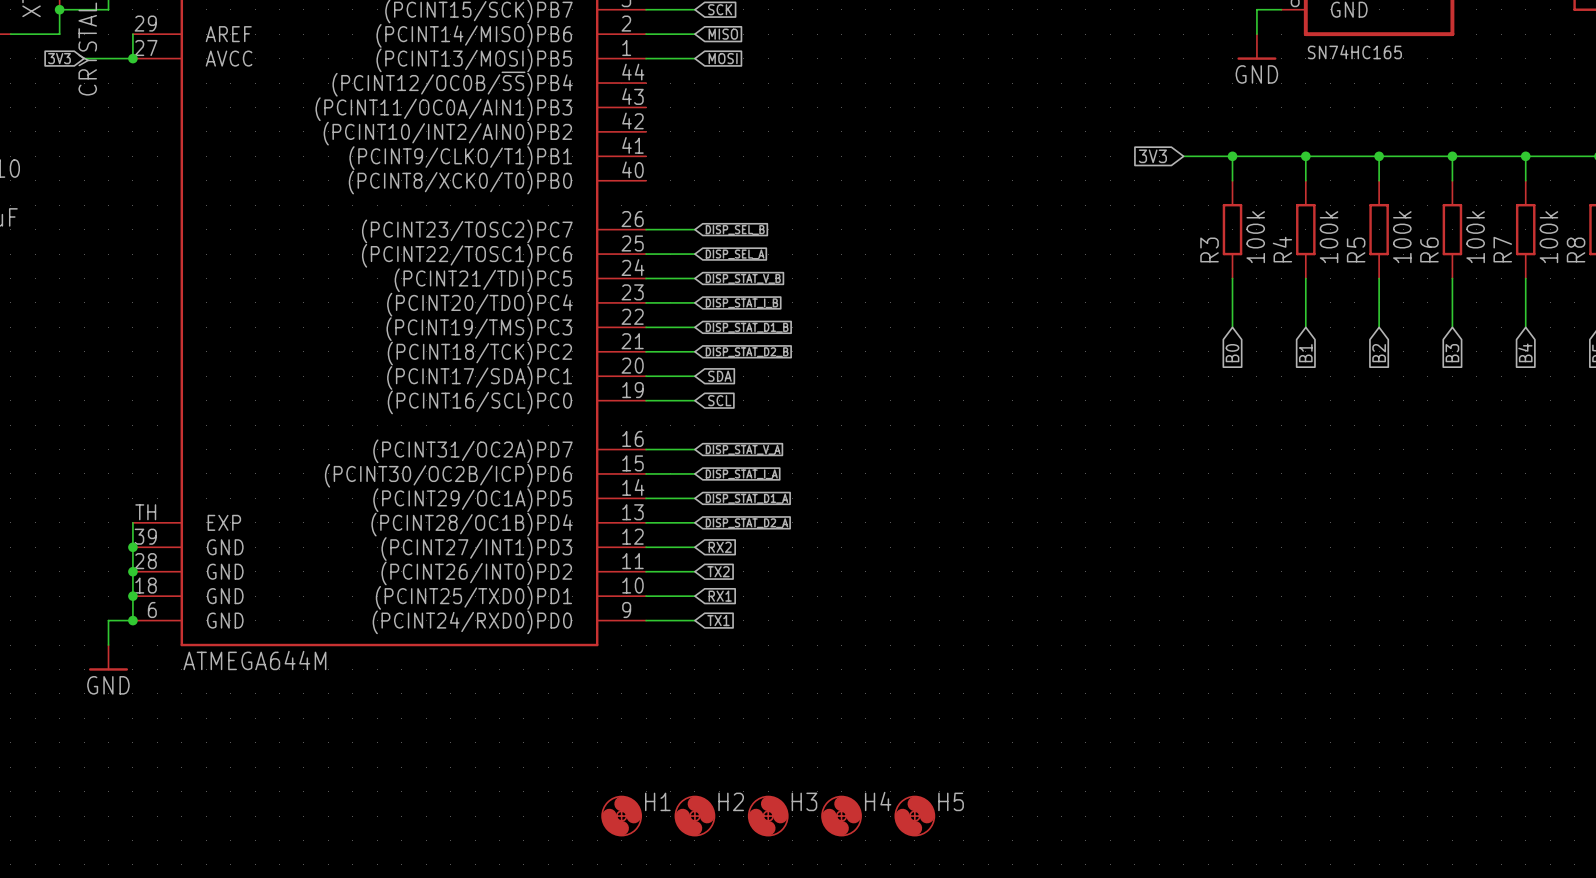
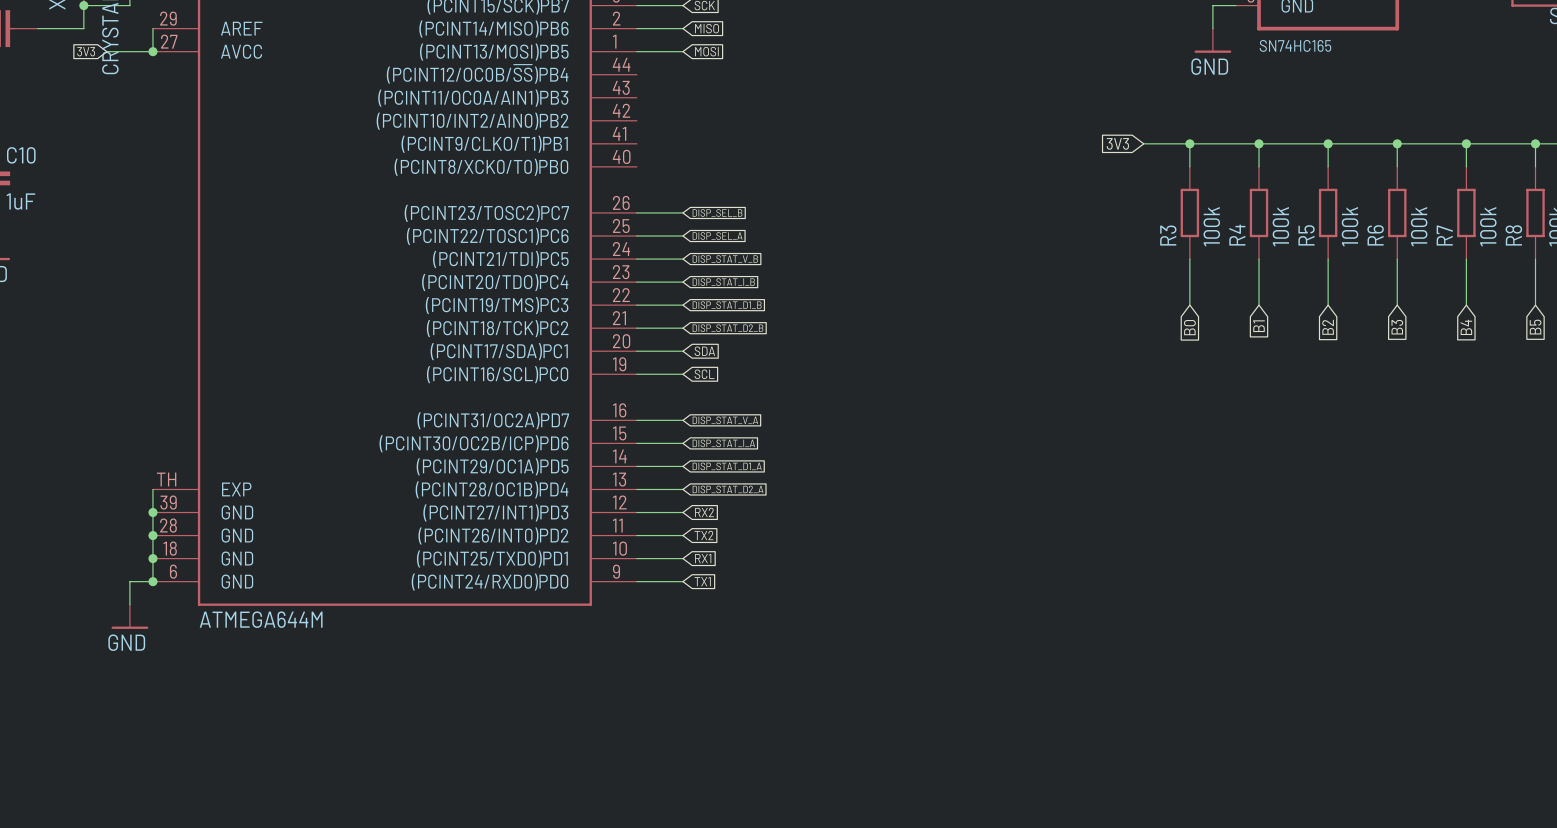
H1: (621, 816) -> none
H2: (694, 816) -> none
H3: (768, 816) -> none
H4: (841, 816) -> none
H5: (914, 816) -> none

